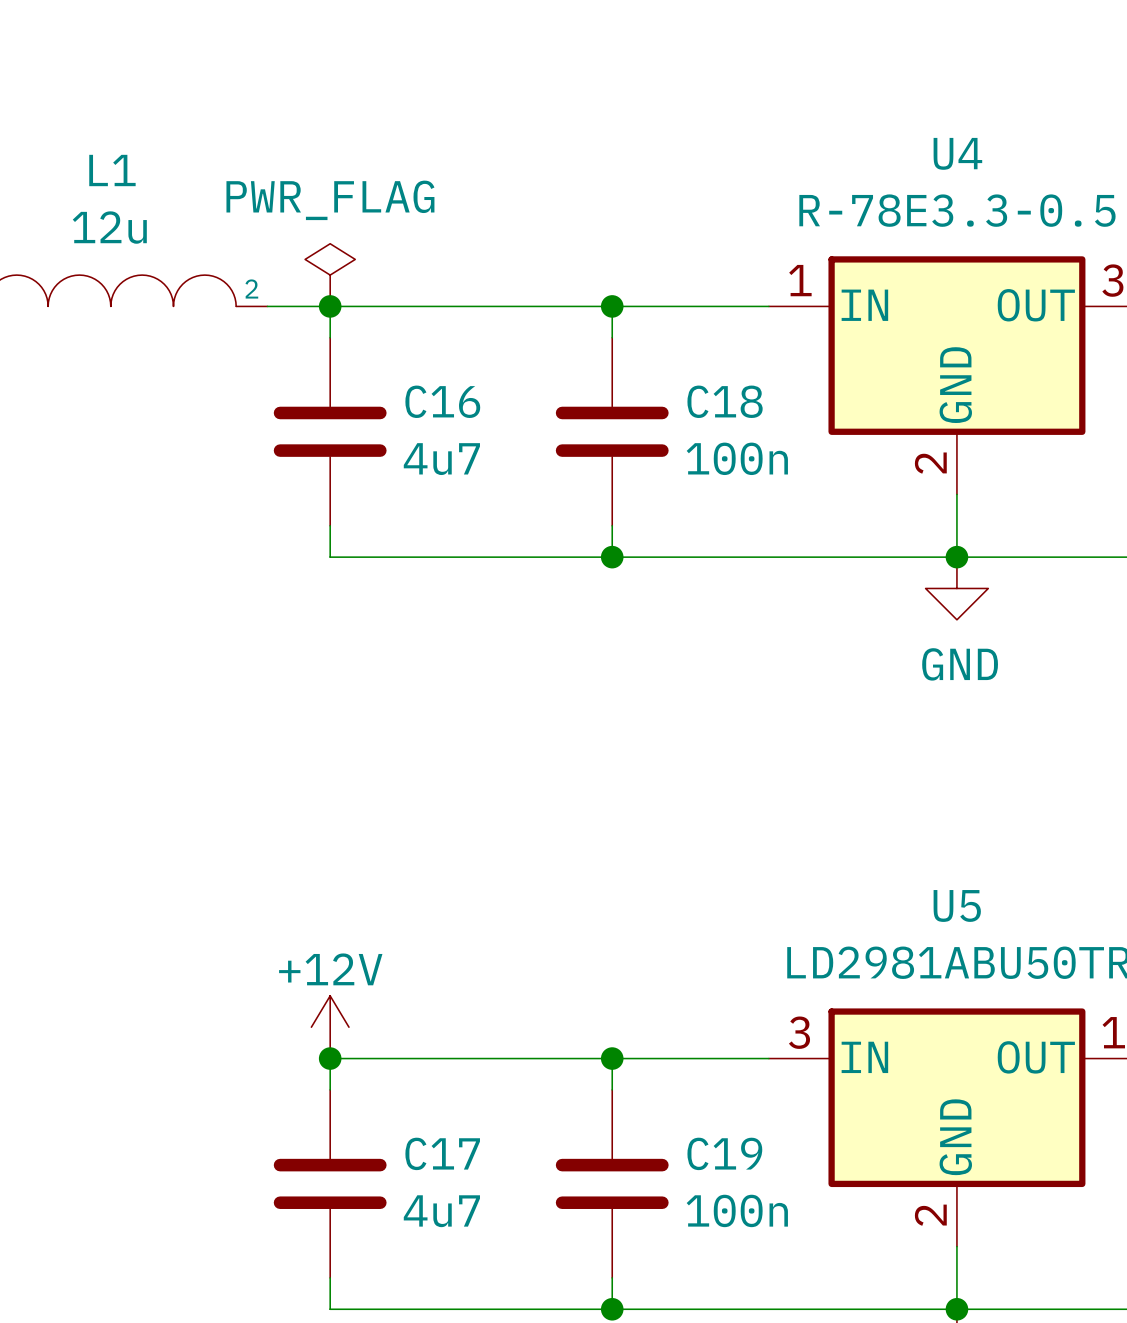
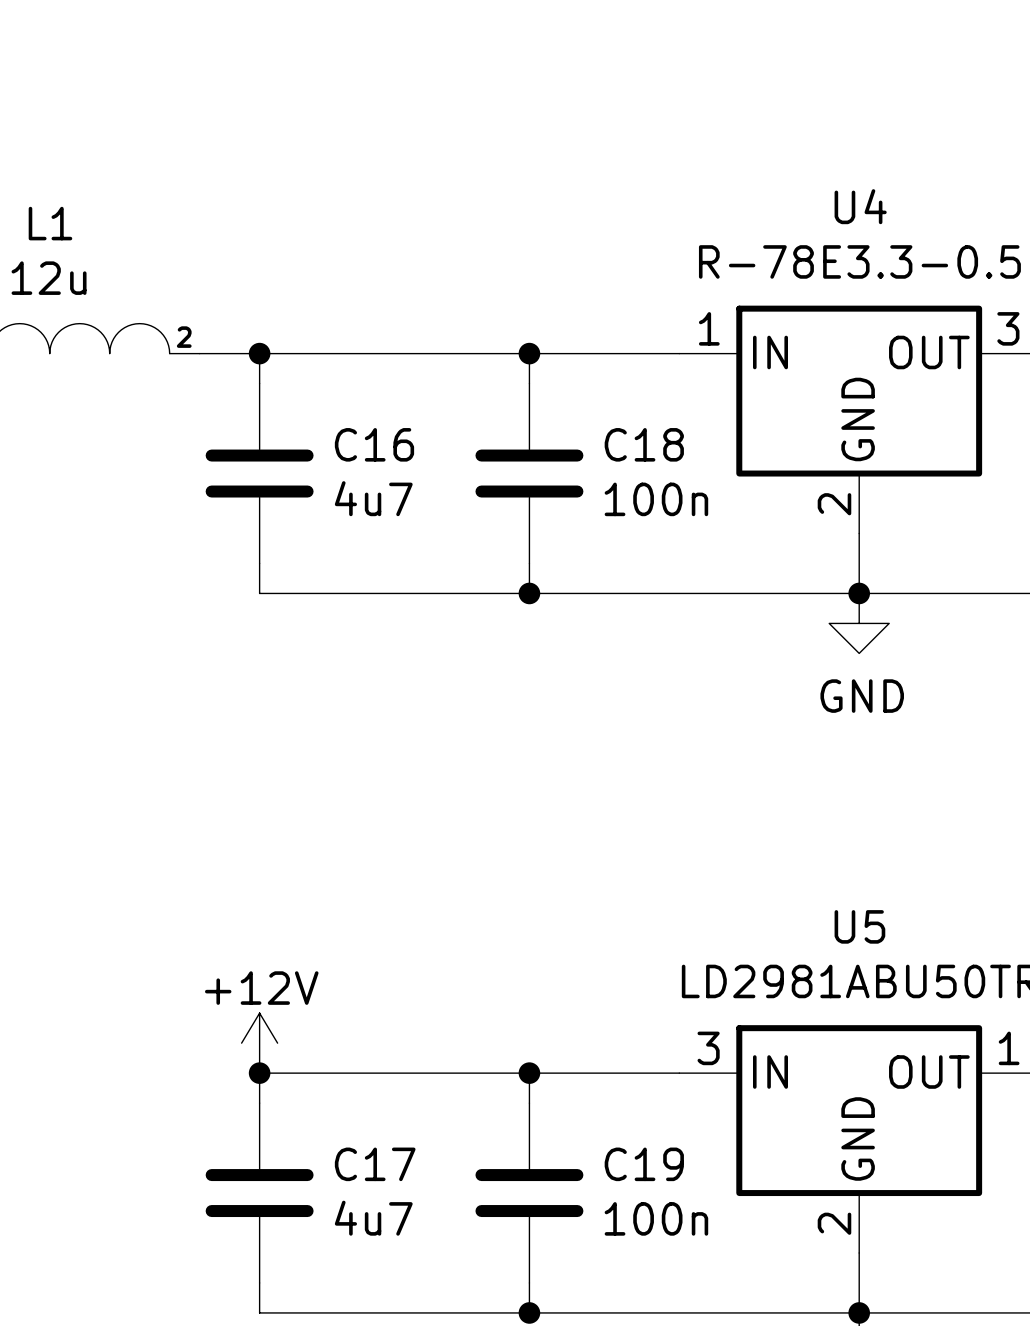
power symbol: PWR_FLAG (330, 275) -> none

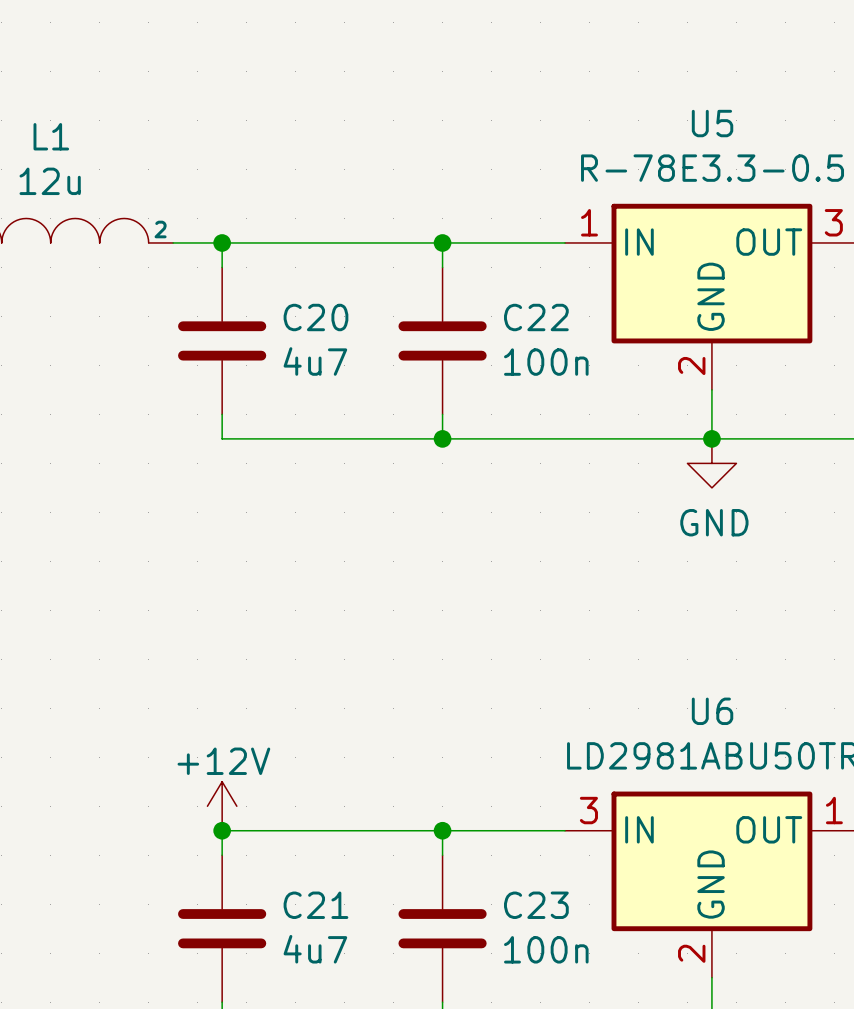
U4 name: U4 (860, 206) -> U5 (712, 123)
C16 name: C16 (374, 444) -> C20 (315, 317)
C18 name: C18 (644, 444) -> C22 (536, 317)
U5 name: U5 (859, 926) -> U6 (712, 711)
C17 name: C17 (375, 1164) -> C21 (315, 905)
C19 name: C19 (644, 1164) -> C23 (536, 905)

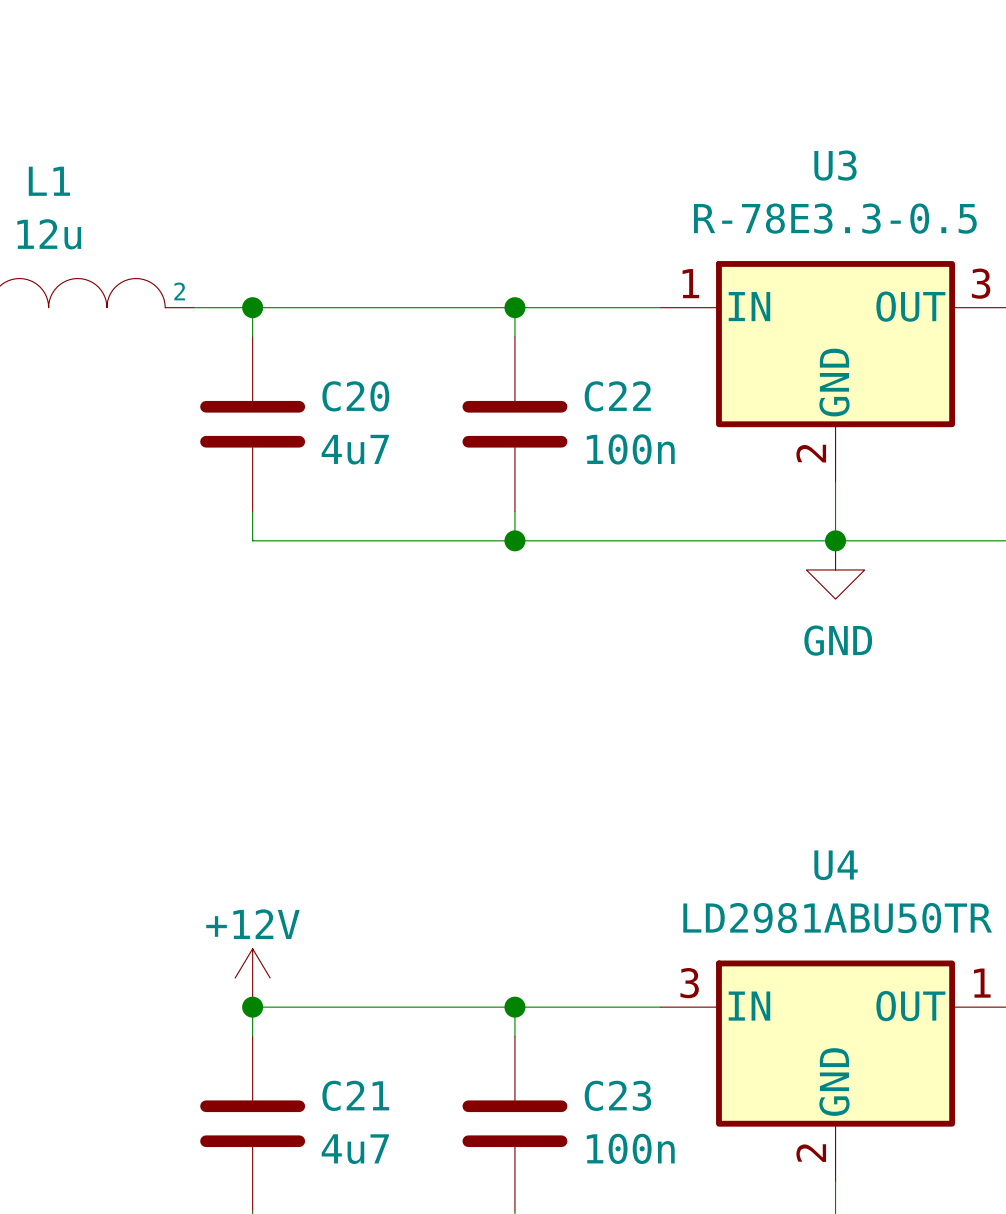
U5 name: U5 (712, 123) -> U3 (835, 165)
U6 name: U6 (712, 711) -> U4 (836, 865)

